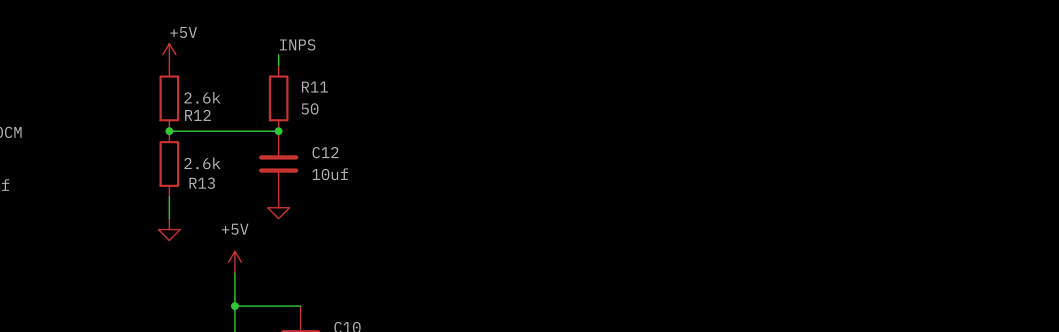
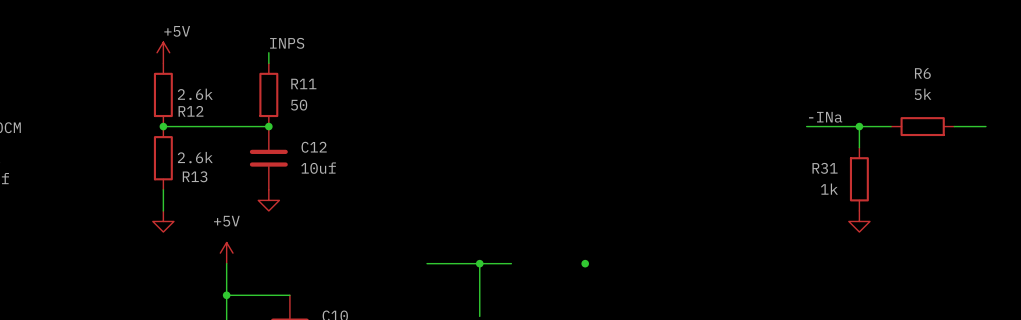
label: none -> -INa (825, 117)
wire: none -> (806, 126) (891, 126)
wire: none -> (859, 126) (859, 147)
junction: none -> (859, 126)
R6: none -> 5k (922, 126)
wire: none -> (954, 126) (985, 126)
R31: none -> 1k (859, 179)
power symbol: none -> (859, 221)
wire: none -> (427, 263) (511, 263)
wire: none -> (479, 263) (479, 316)
junction: none -> (479, 263)
junction: none -> (585, 263)

